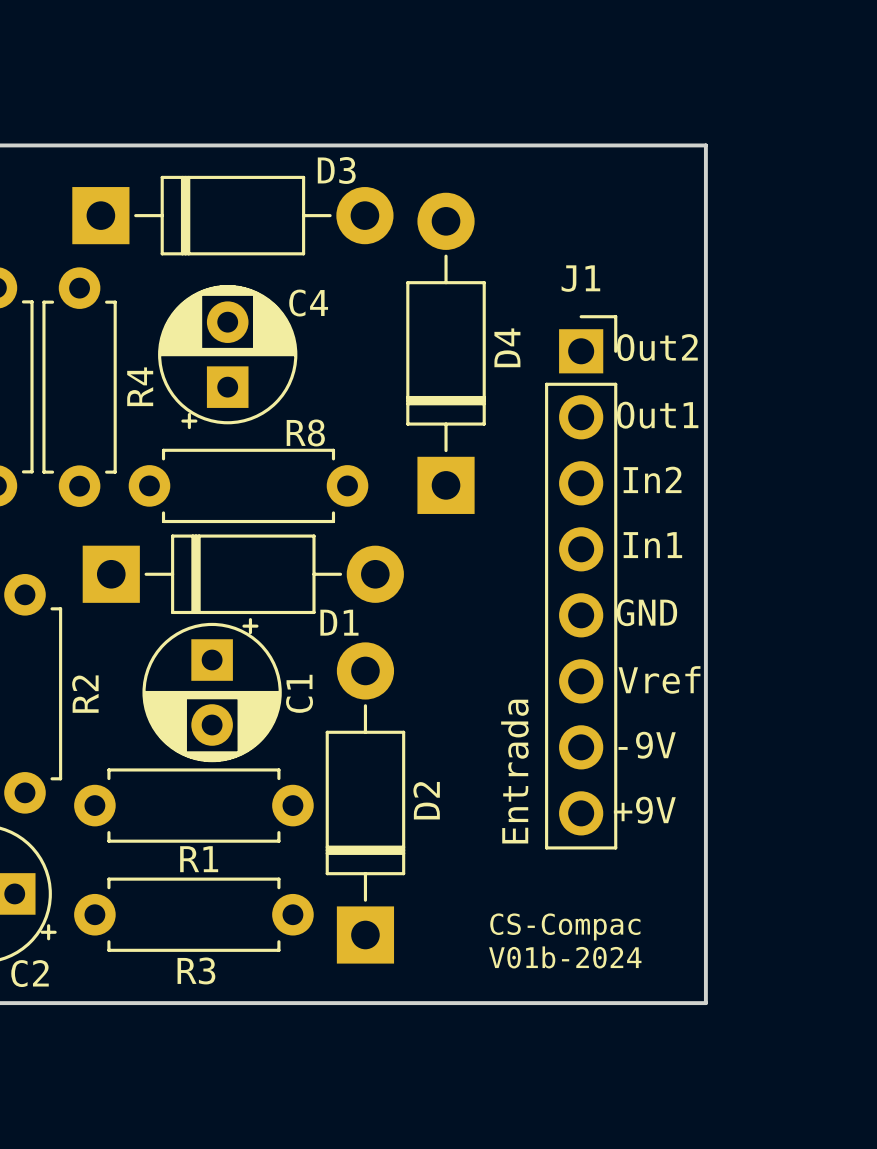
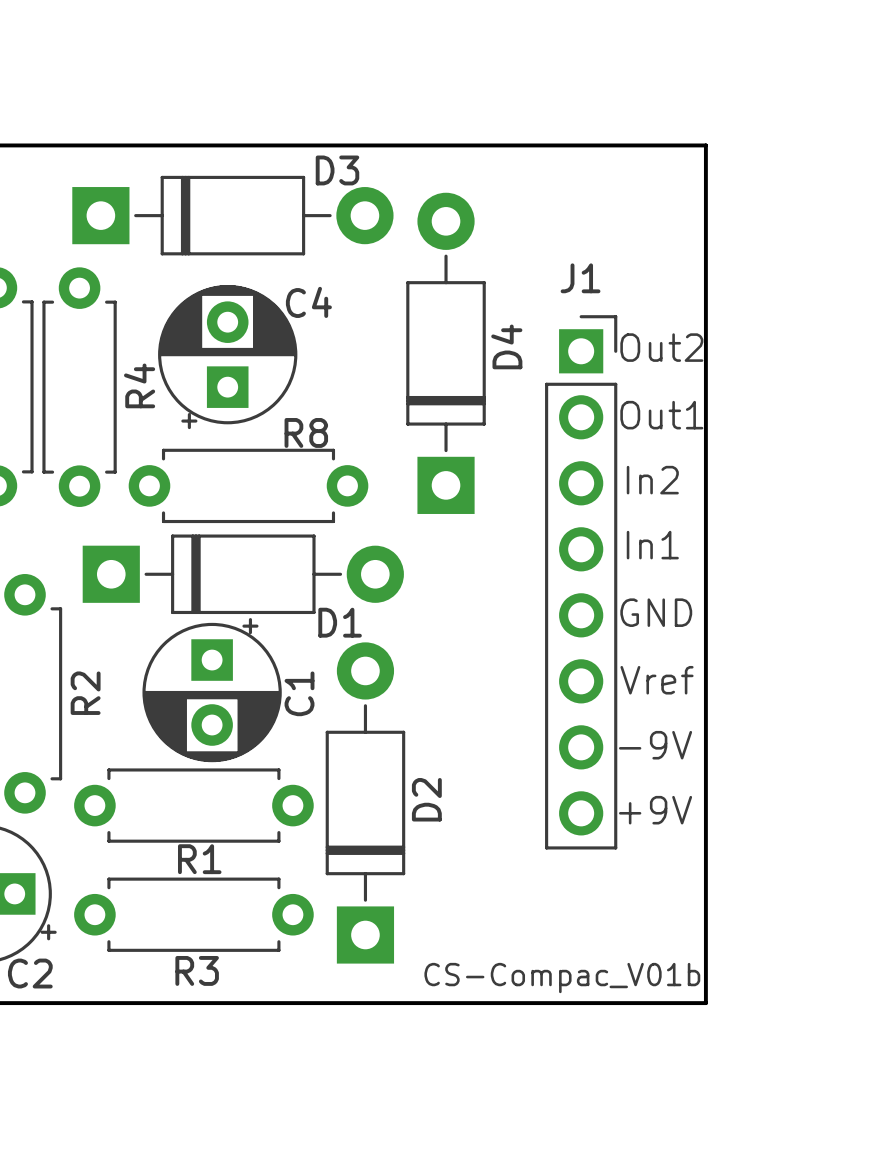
J1 value: Entrada (514, 771) -> none
text: CS-Compac (565, 926) -> none
text: V01b-2024 (565, 957) -> none
text: none -> CS-Compac_V01b (562, 978)

